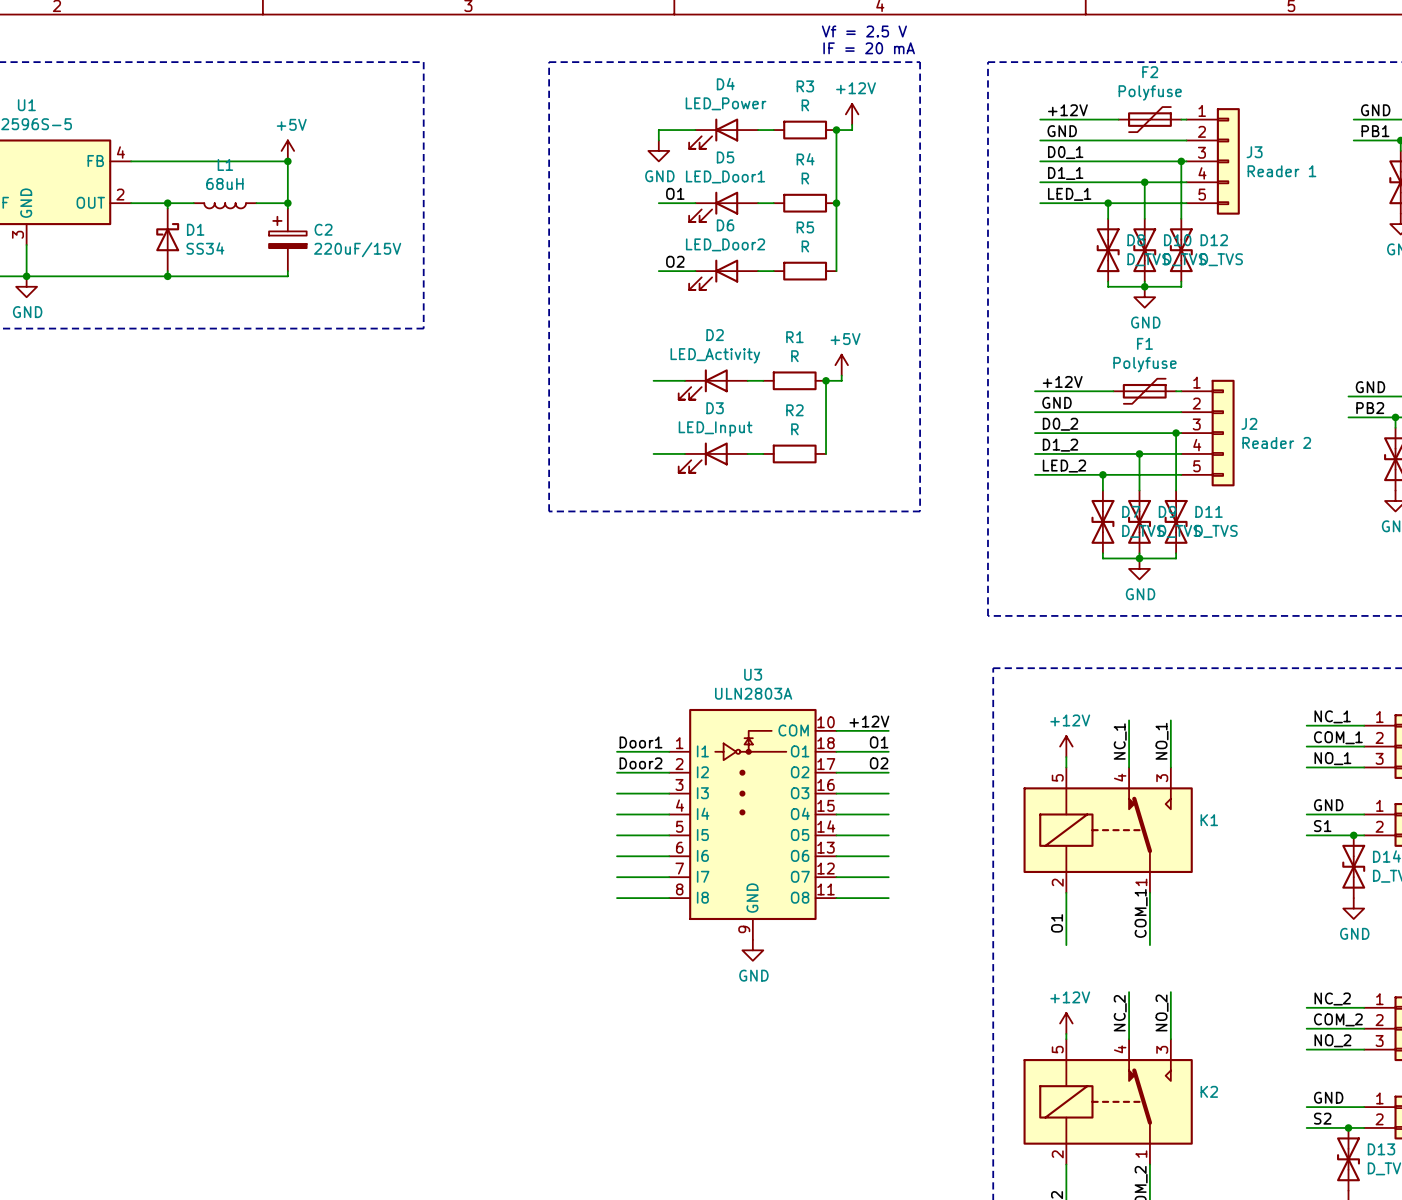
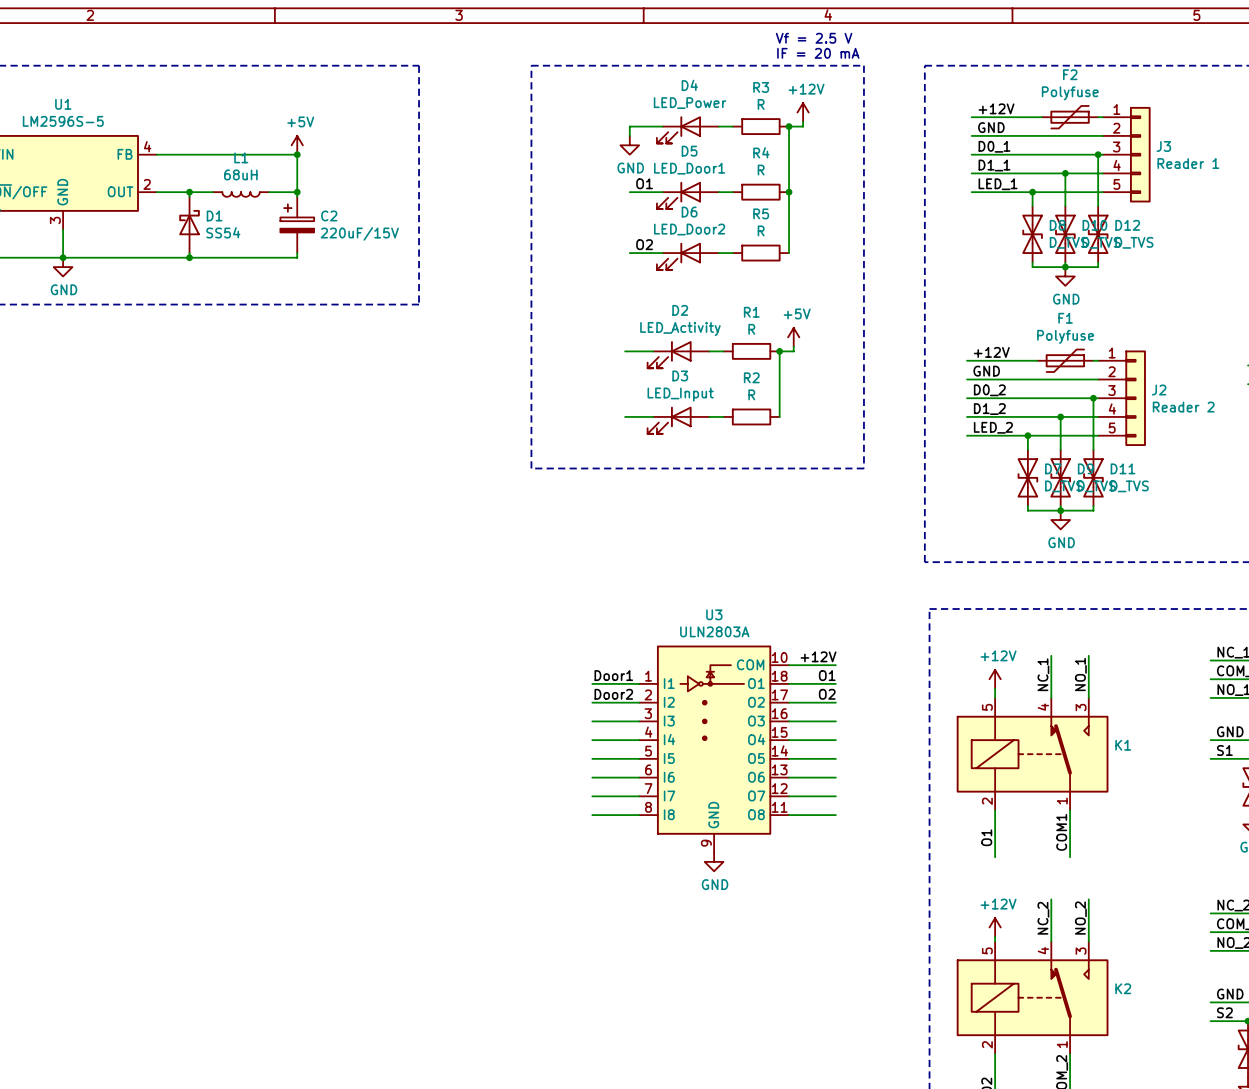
D1 value: SS34 (205, 248) -> SS54 (223, 232)
label: COM_1 (1141, 913) -> COM1 (1061, 832)

